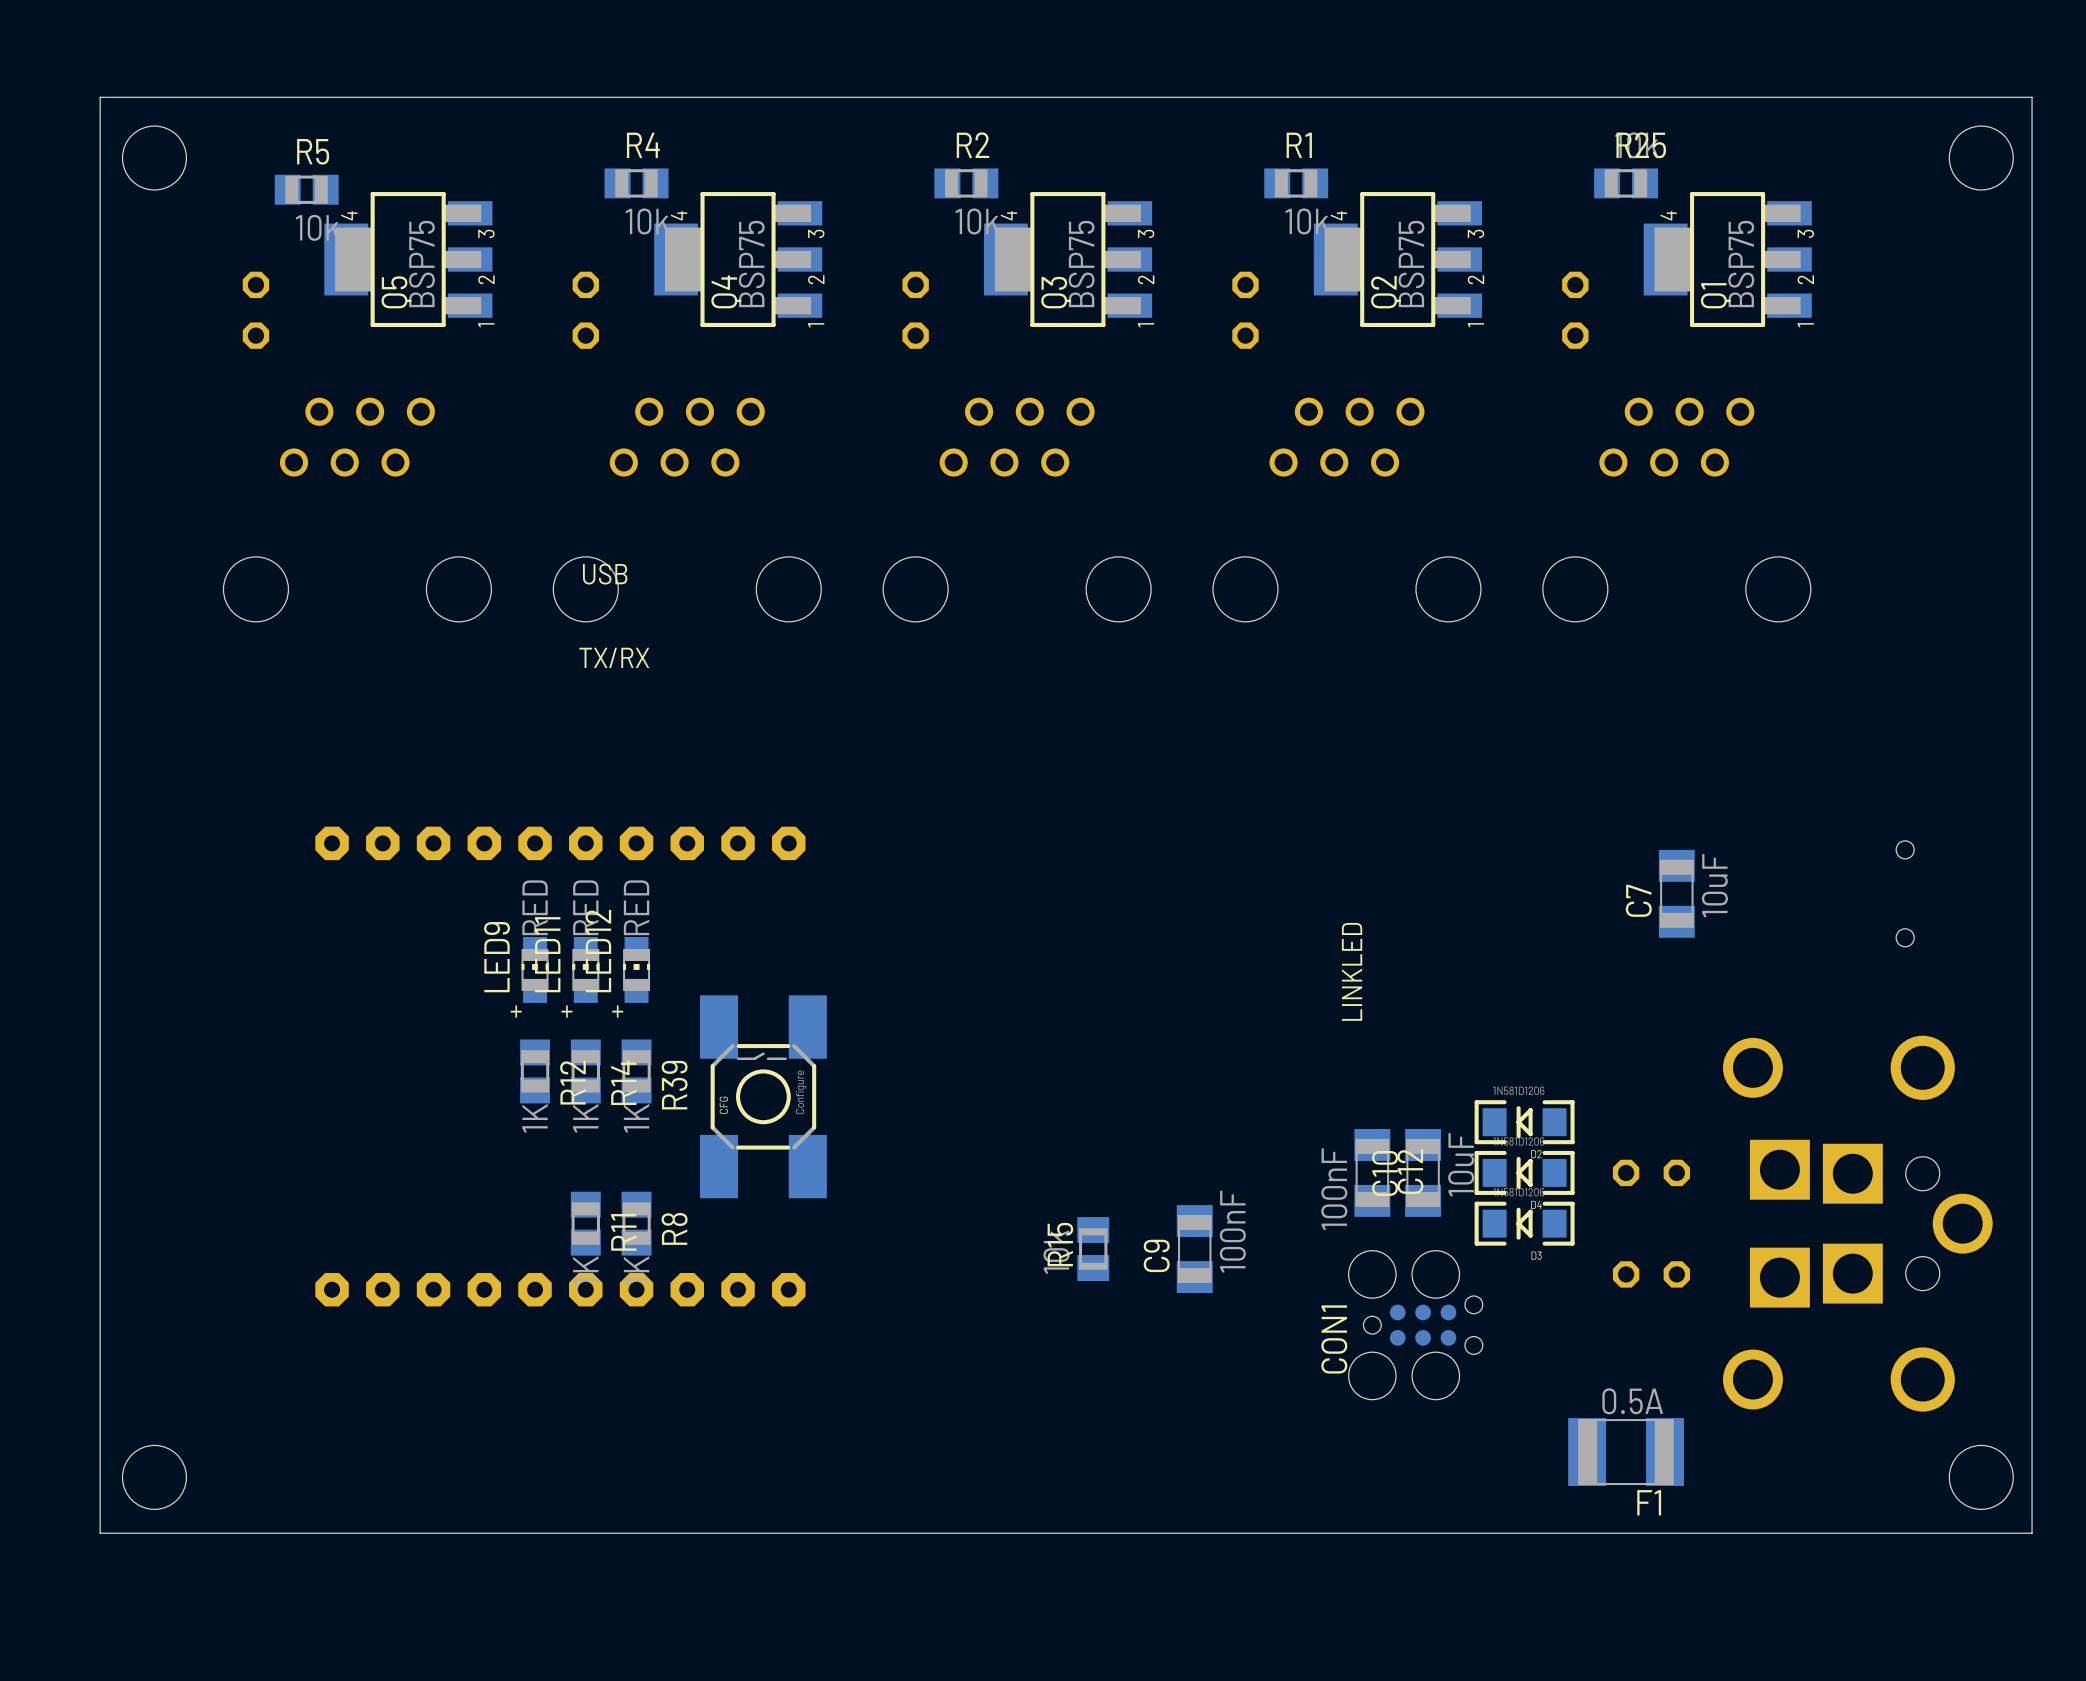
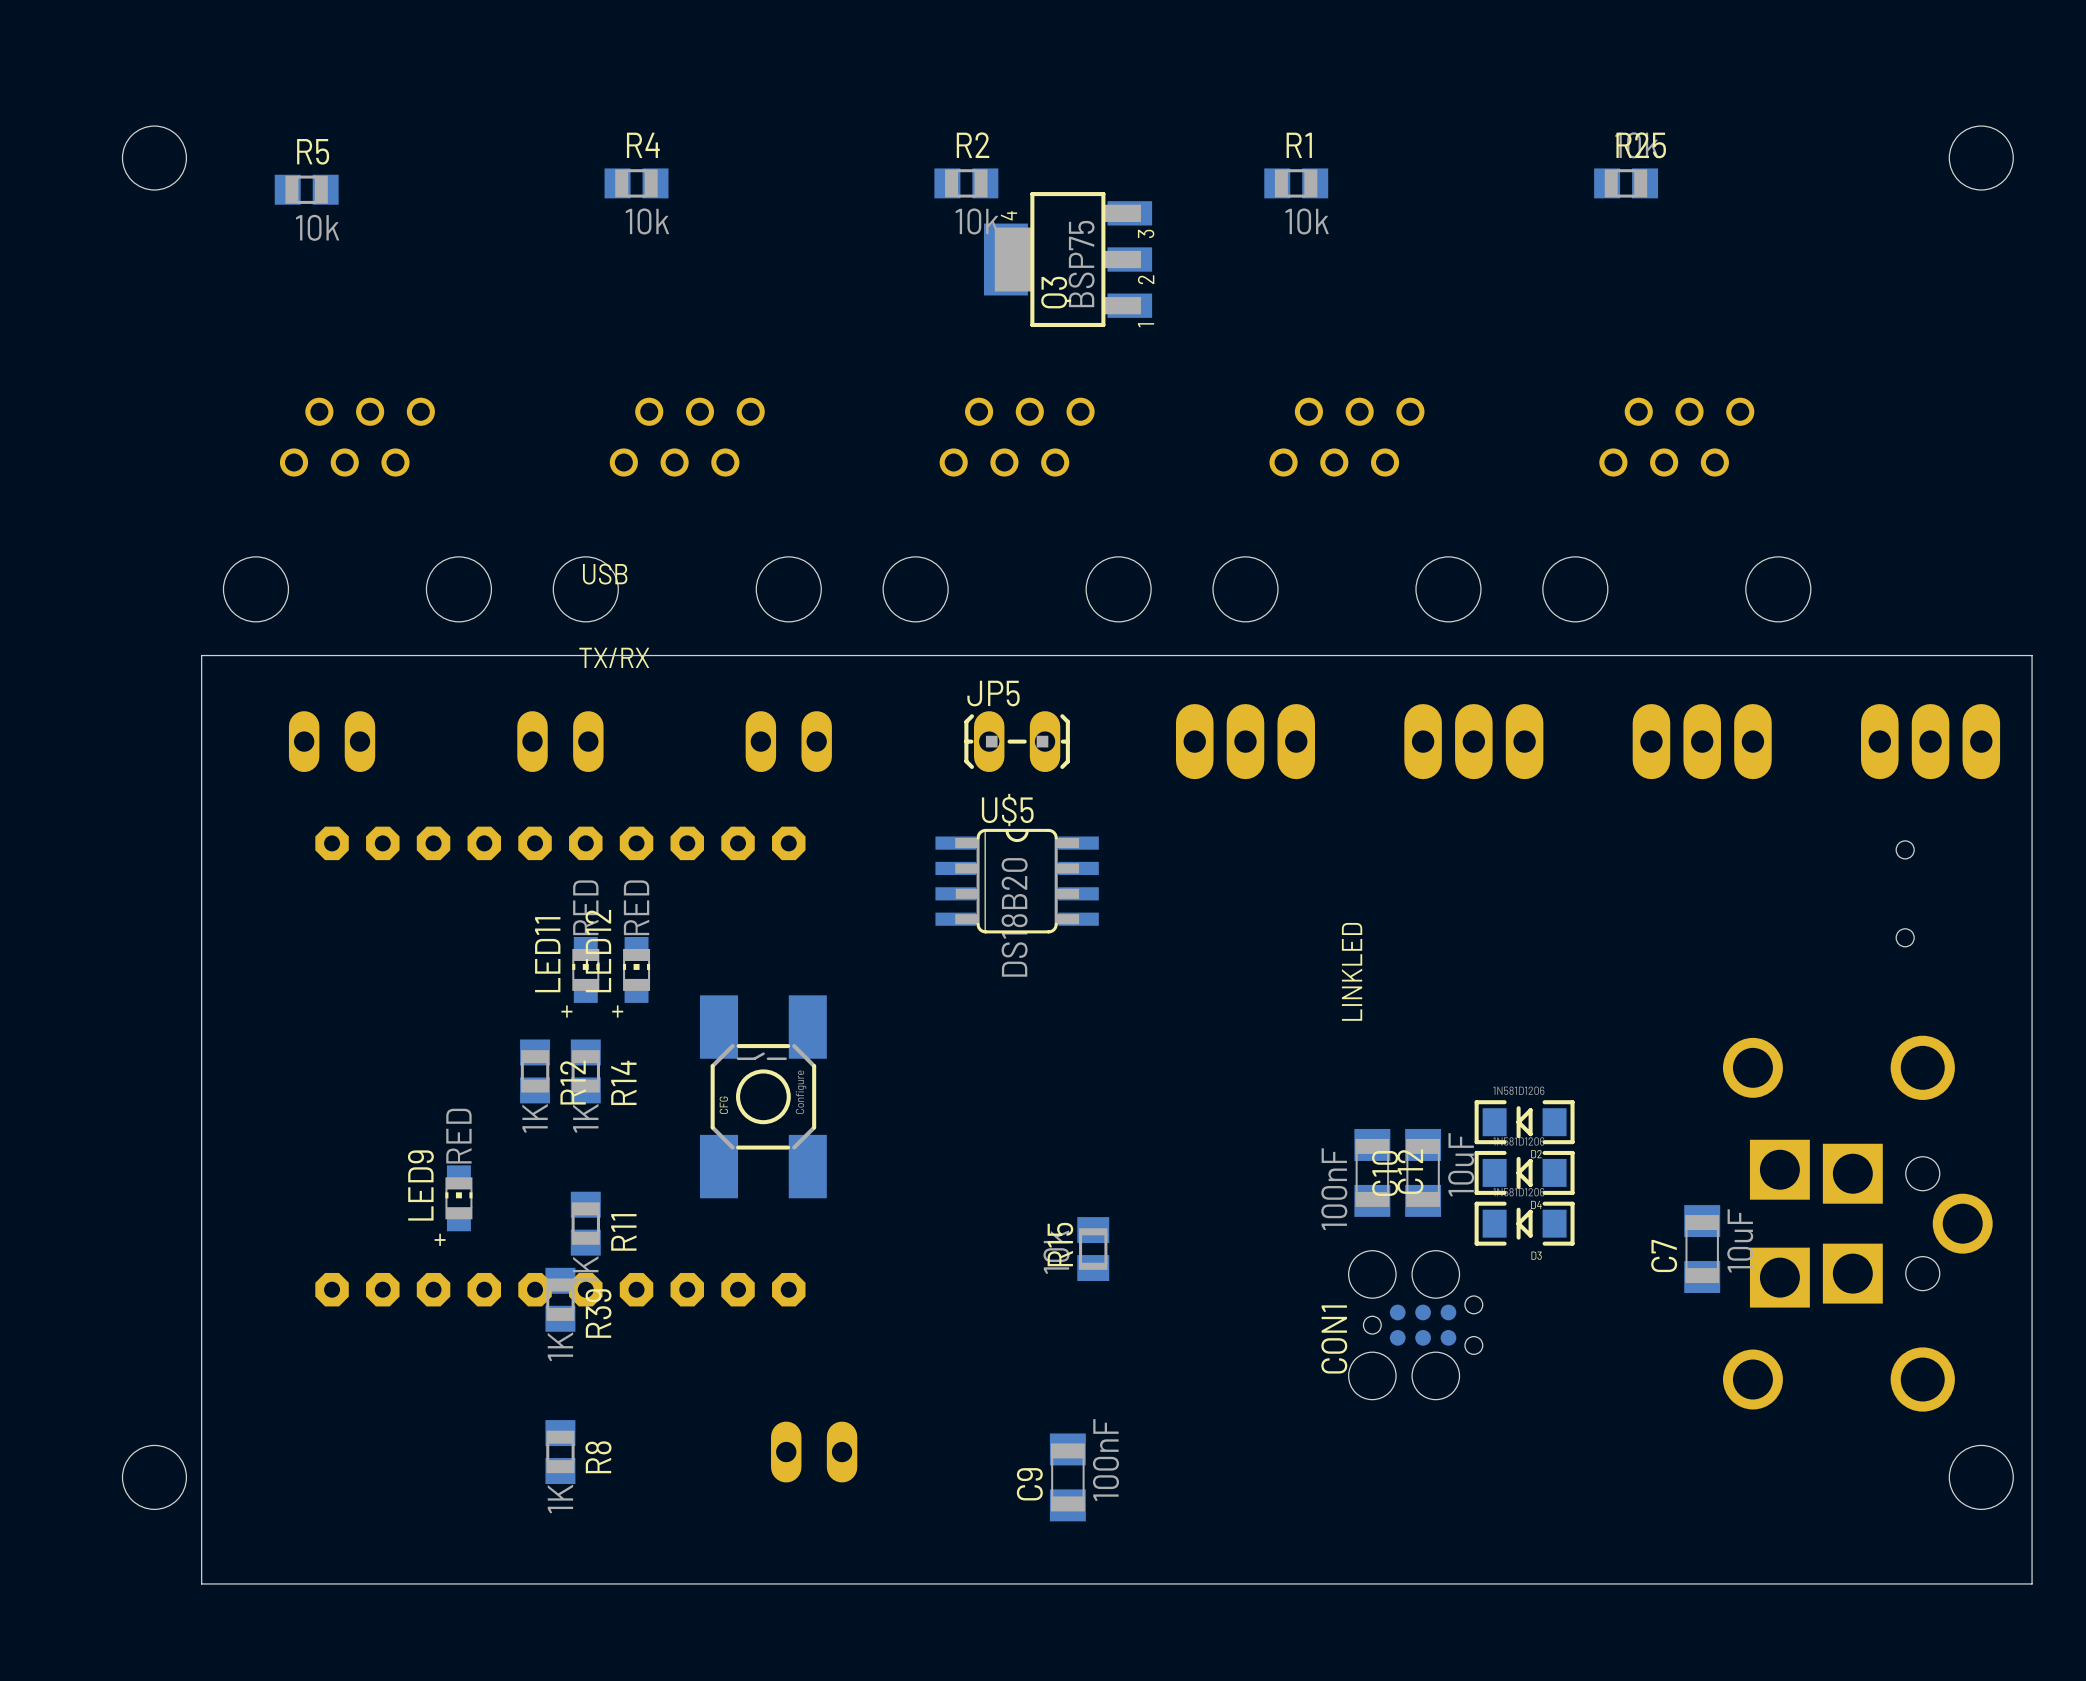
Q5: BSP75 (408, 259) -> none
Q4: BSP75 (738, 259) -> none
Q2: BSP75 (1397, 259) -> none
Q1: BSP75 (1727, 259) -> none
part: (255, 310) -> none
part: (585, 310) -> none
part: (915, 310) -> none
part: (1245, 310) -> none
part: (1575, 310) -> none
board edge: (2032, 655) (2032, 97) (100, 97) (100, 1533) (2032, 1533) -> (2032, 655) (201, 655) (201, 1583) (2032, 1583) (2032, 1533)
part: none -> (332, 741)
part: none -> (560, 741)
part: none -> (788, 741)
JP5: none -> (1017, 741)
part: none -> (1245, 741)
part: none -> (1473, 741)
part: none -> (1702, 741)
part: none -> (1930, 741)
U$5: none -> DS18B20 (1017, 881)
C7 position: (1676, 893) -> (1702, 1249)
LED9 position: (535, 969) -> (458, 1198)
R39 position: (636, 1071) -> (560, 1299)
part: (1651, 1172) -> none
R8 position: (636, 1223) -> (560, 1452)
C9 position: (1194, 1249) -> (1067, 1477)
part: (1651, 1274) -> none
part: none -> (814, 1452)
F1: 0.5A (1626, 1452) -> none

